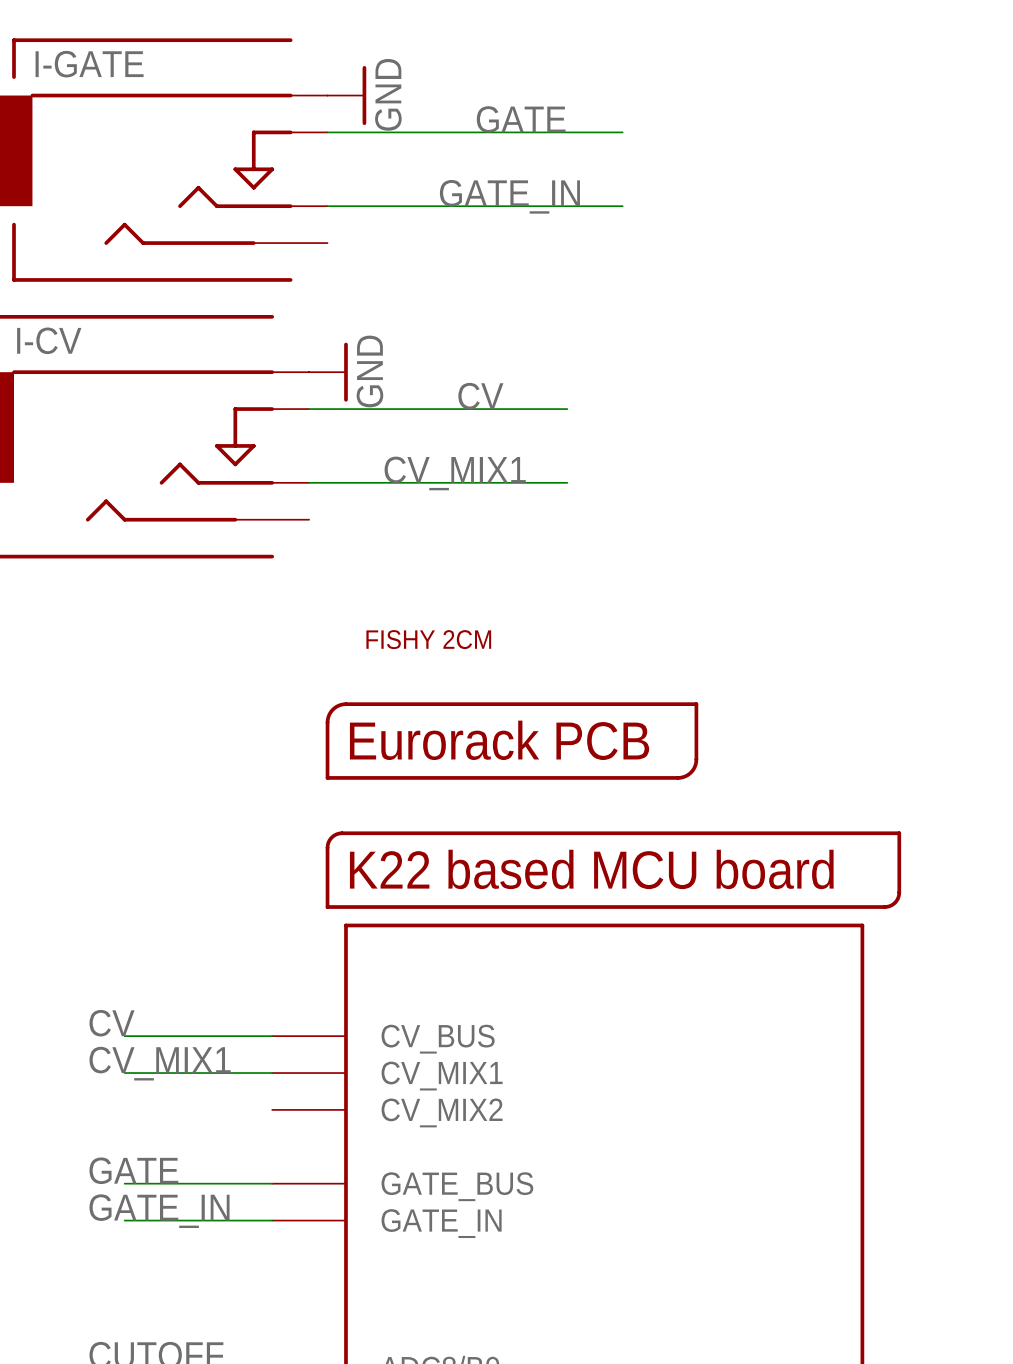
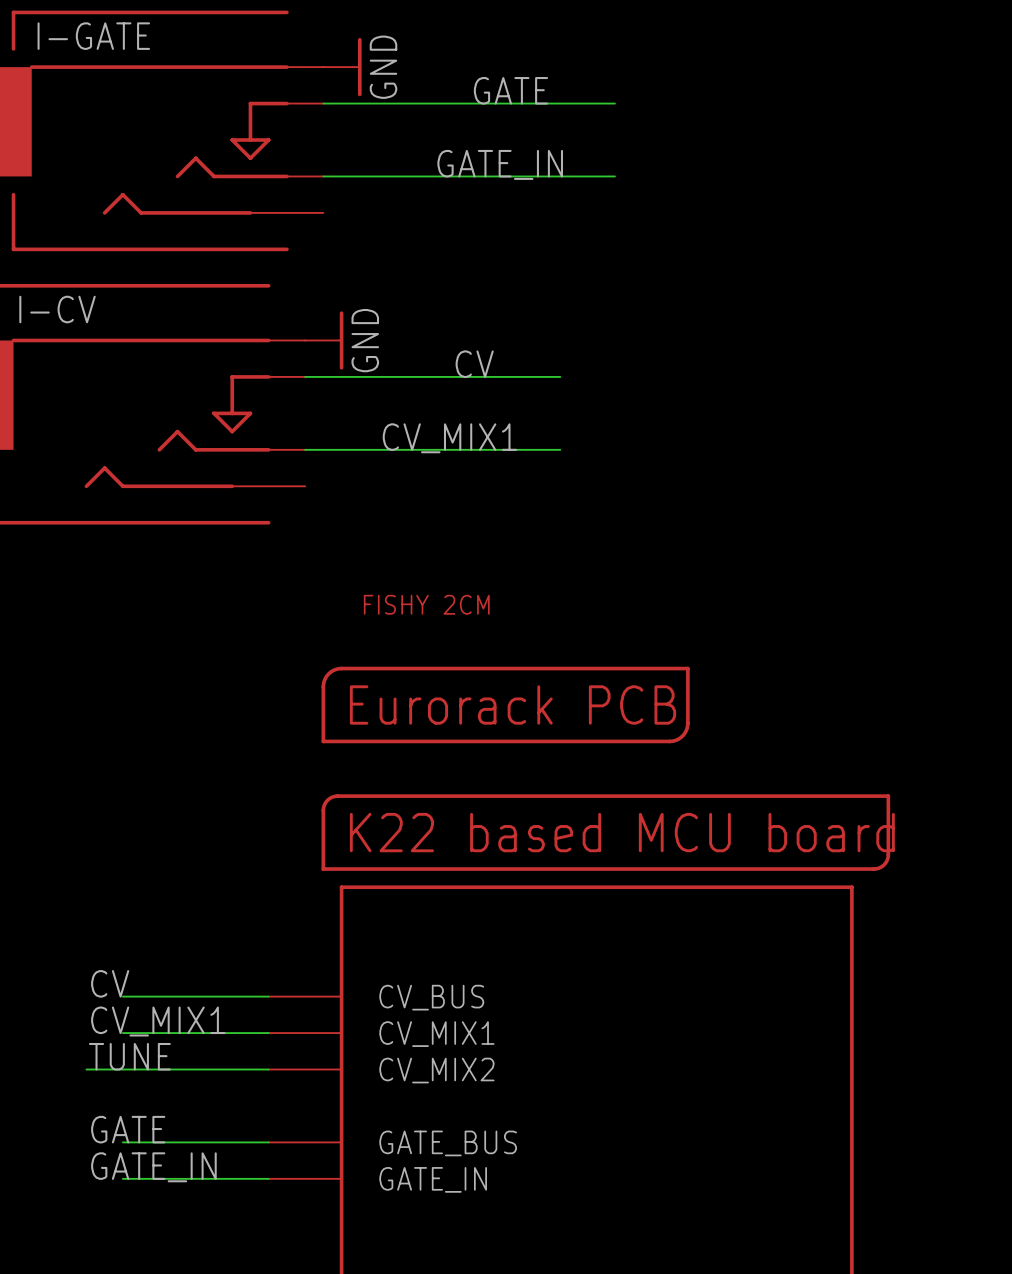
label: none -> TUNE (129, 1056)
wire: none -> (86, 1069) (268, 1069)

